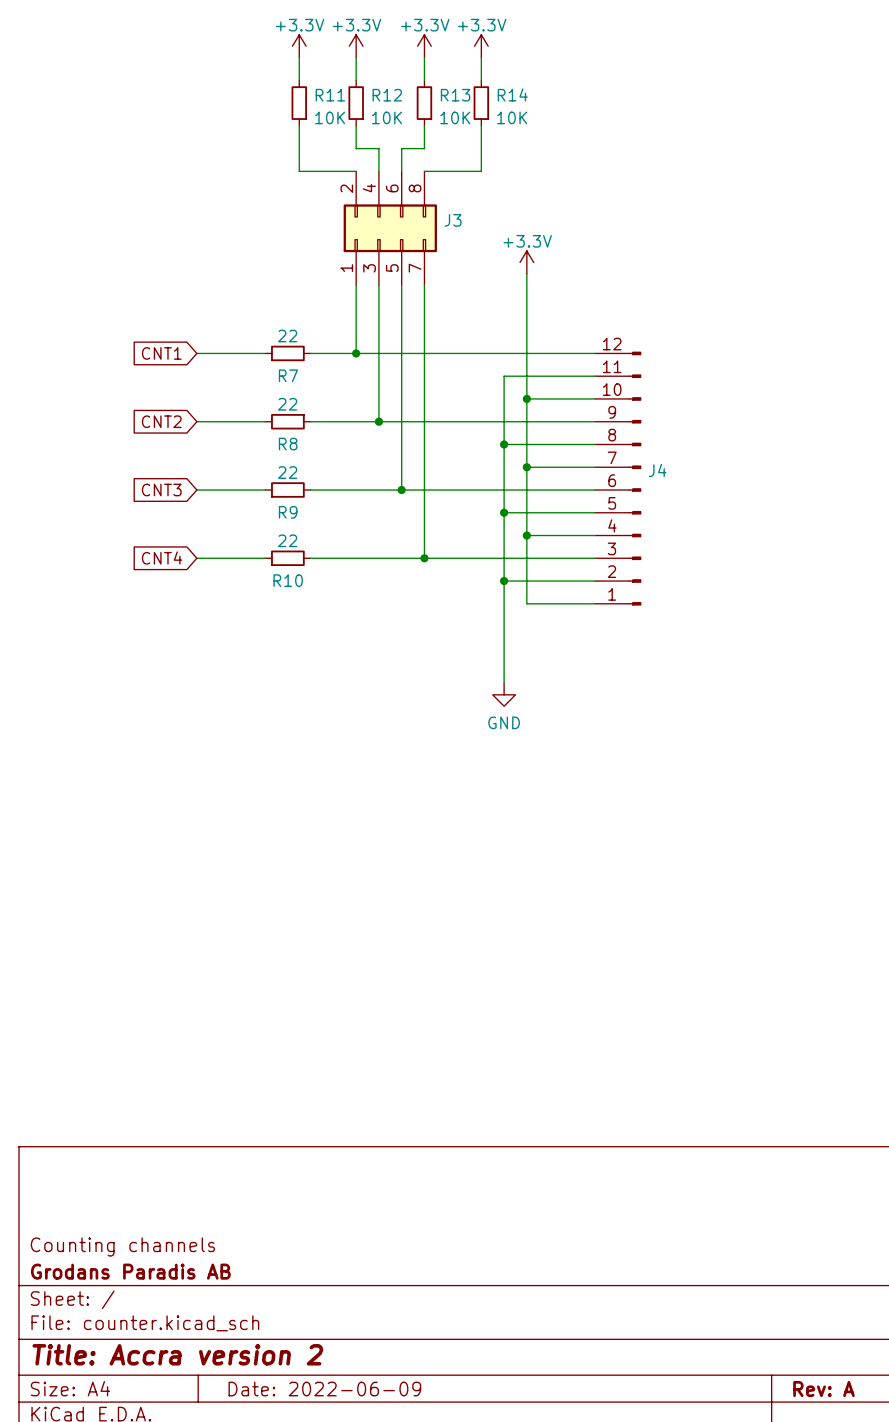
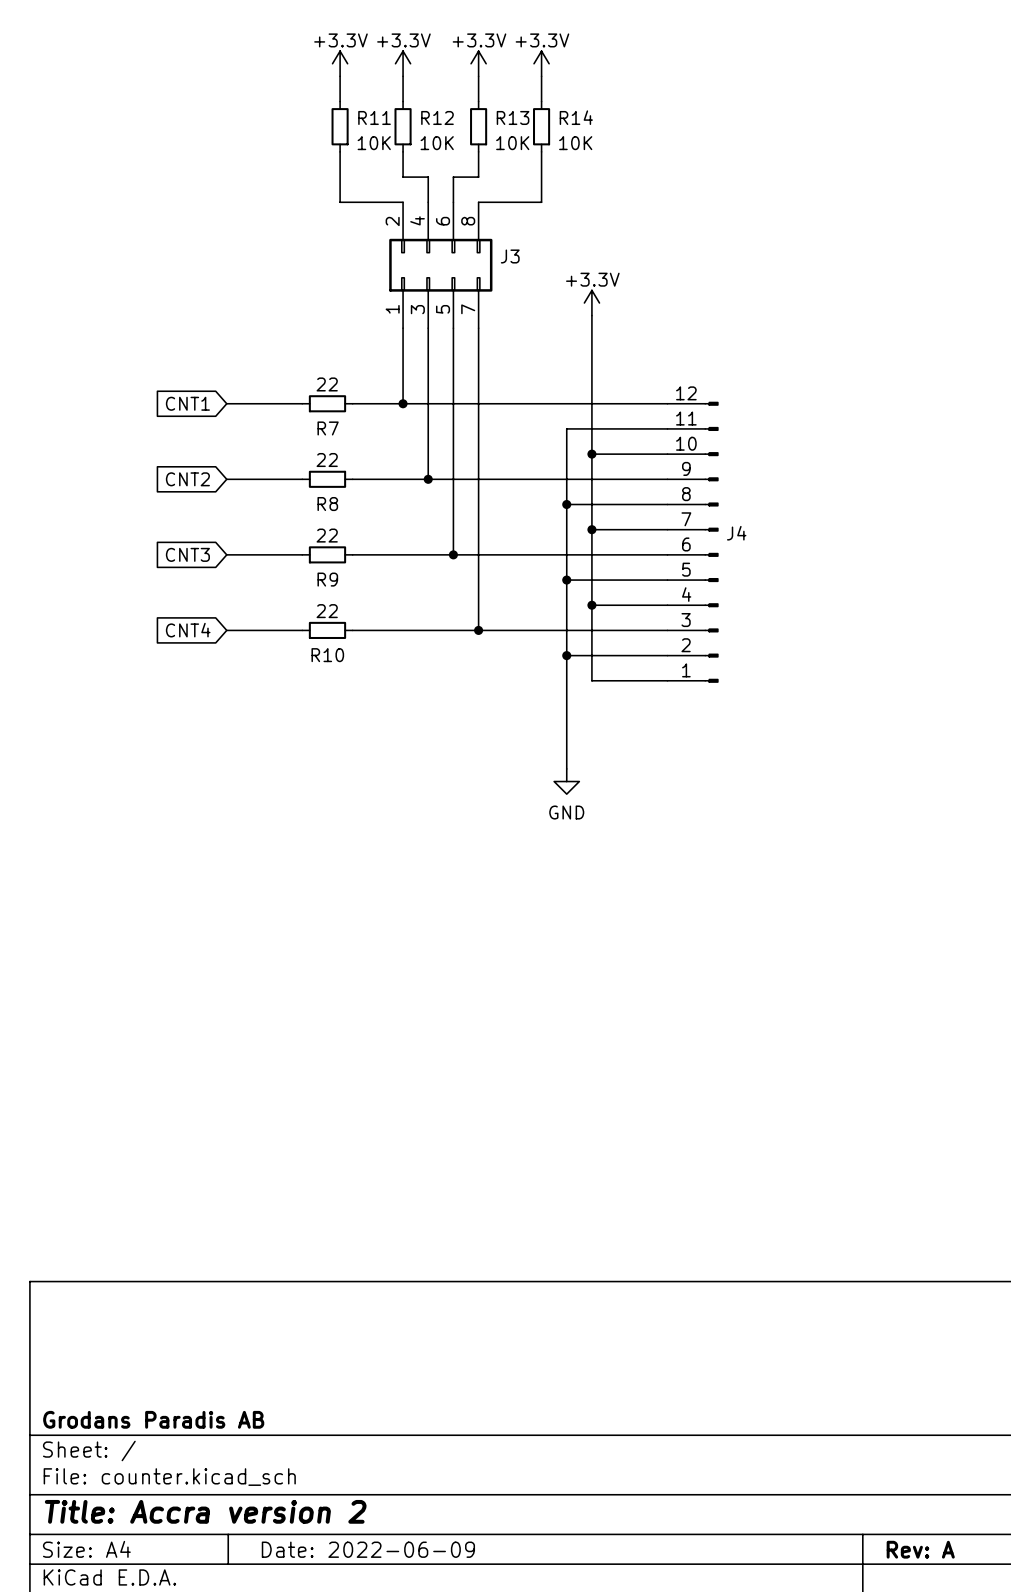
title block: Counting channels (122, 1247) -> none

